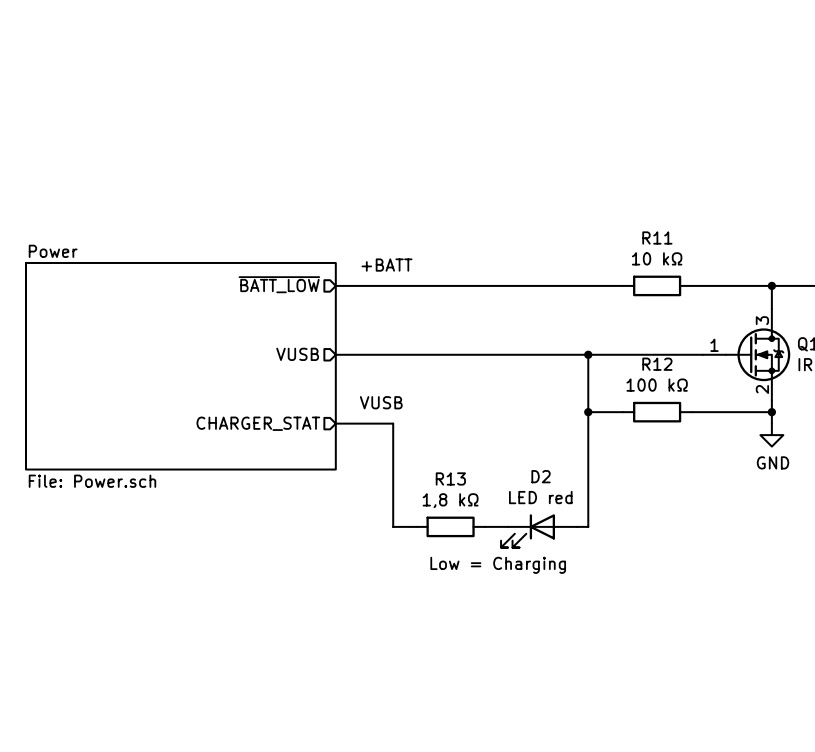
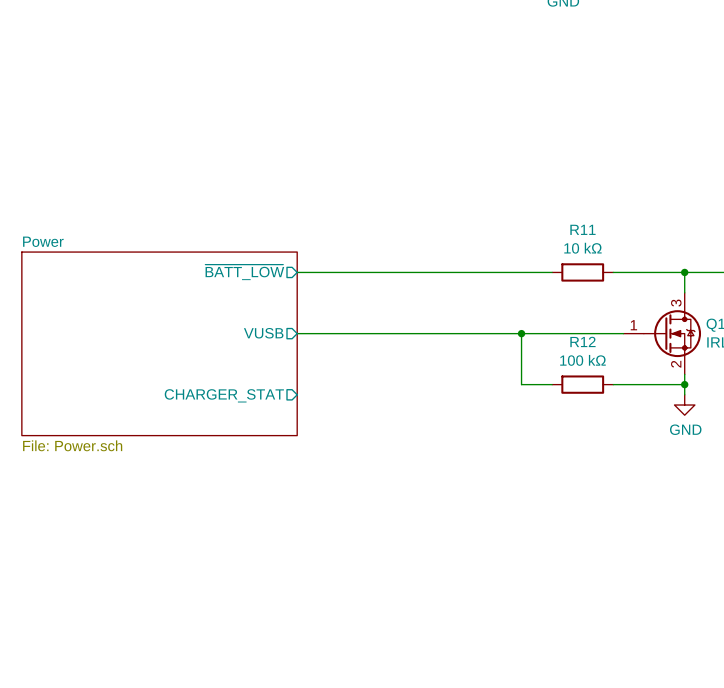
text: +BATT (387, 265) -> none
text: VUSB (381, 402) -> none
wire: (588, 412) (588, 526) (576, 526) -> none
junction: (588, 412) -> none
wire: (335, 423) (393, 423) (393, 526) (416, 526) -> none
R13: 1,8 kΩ (450, 526) -> none
wire: (485, 526) (507, 526) -> none
D2: LED red (538, 530) -> none
text: Low = Charging (498, 565) -> none

